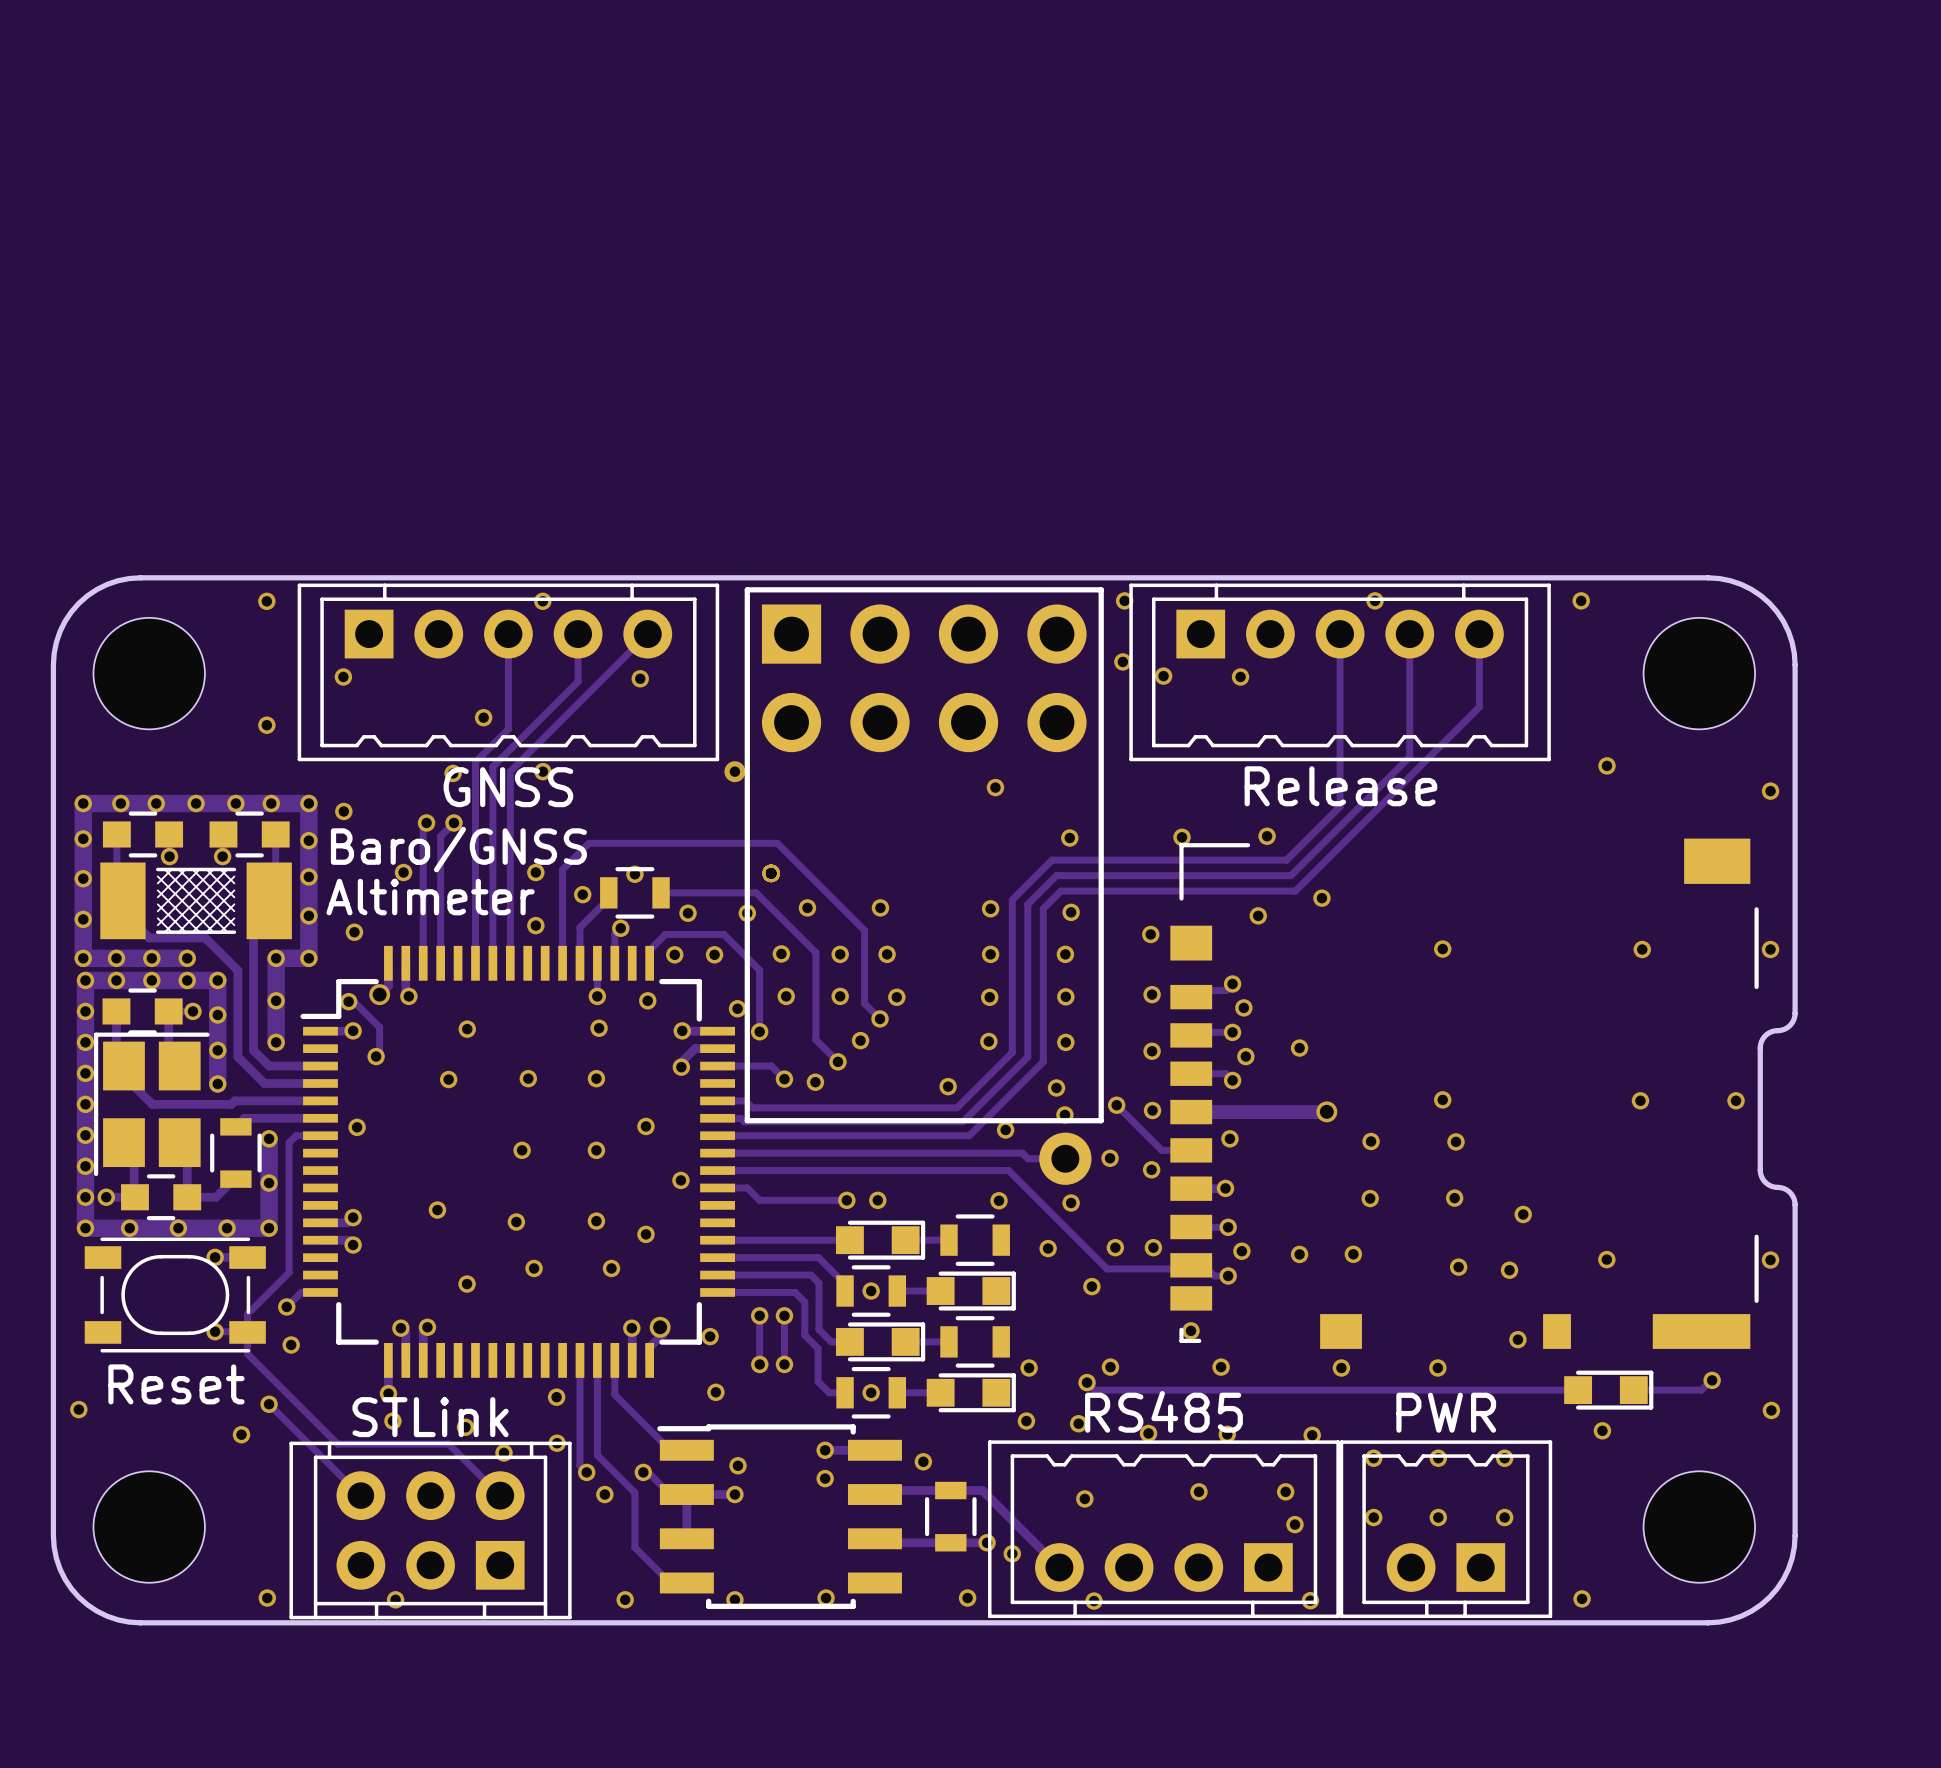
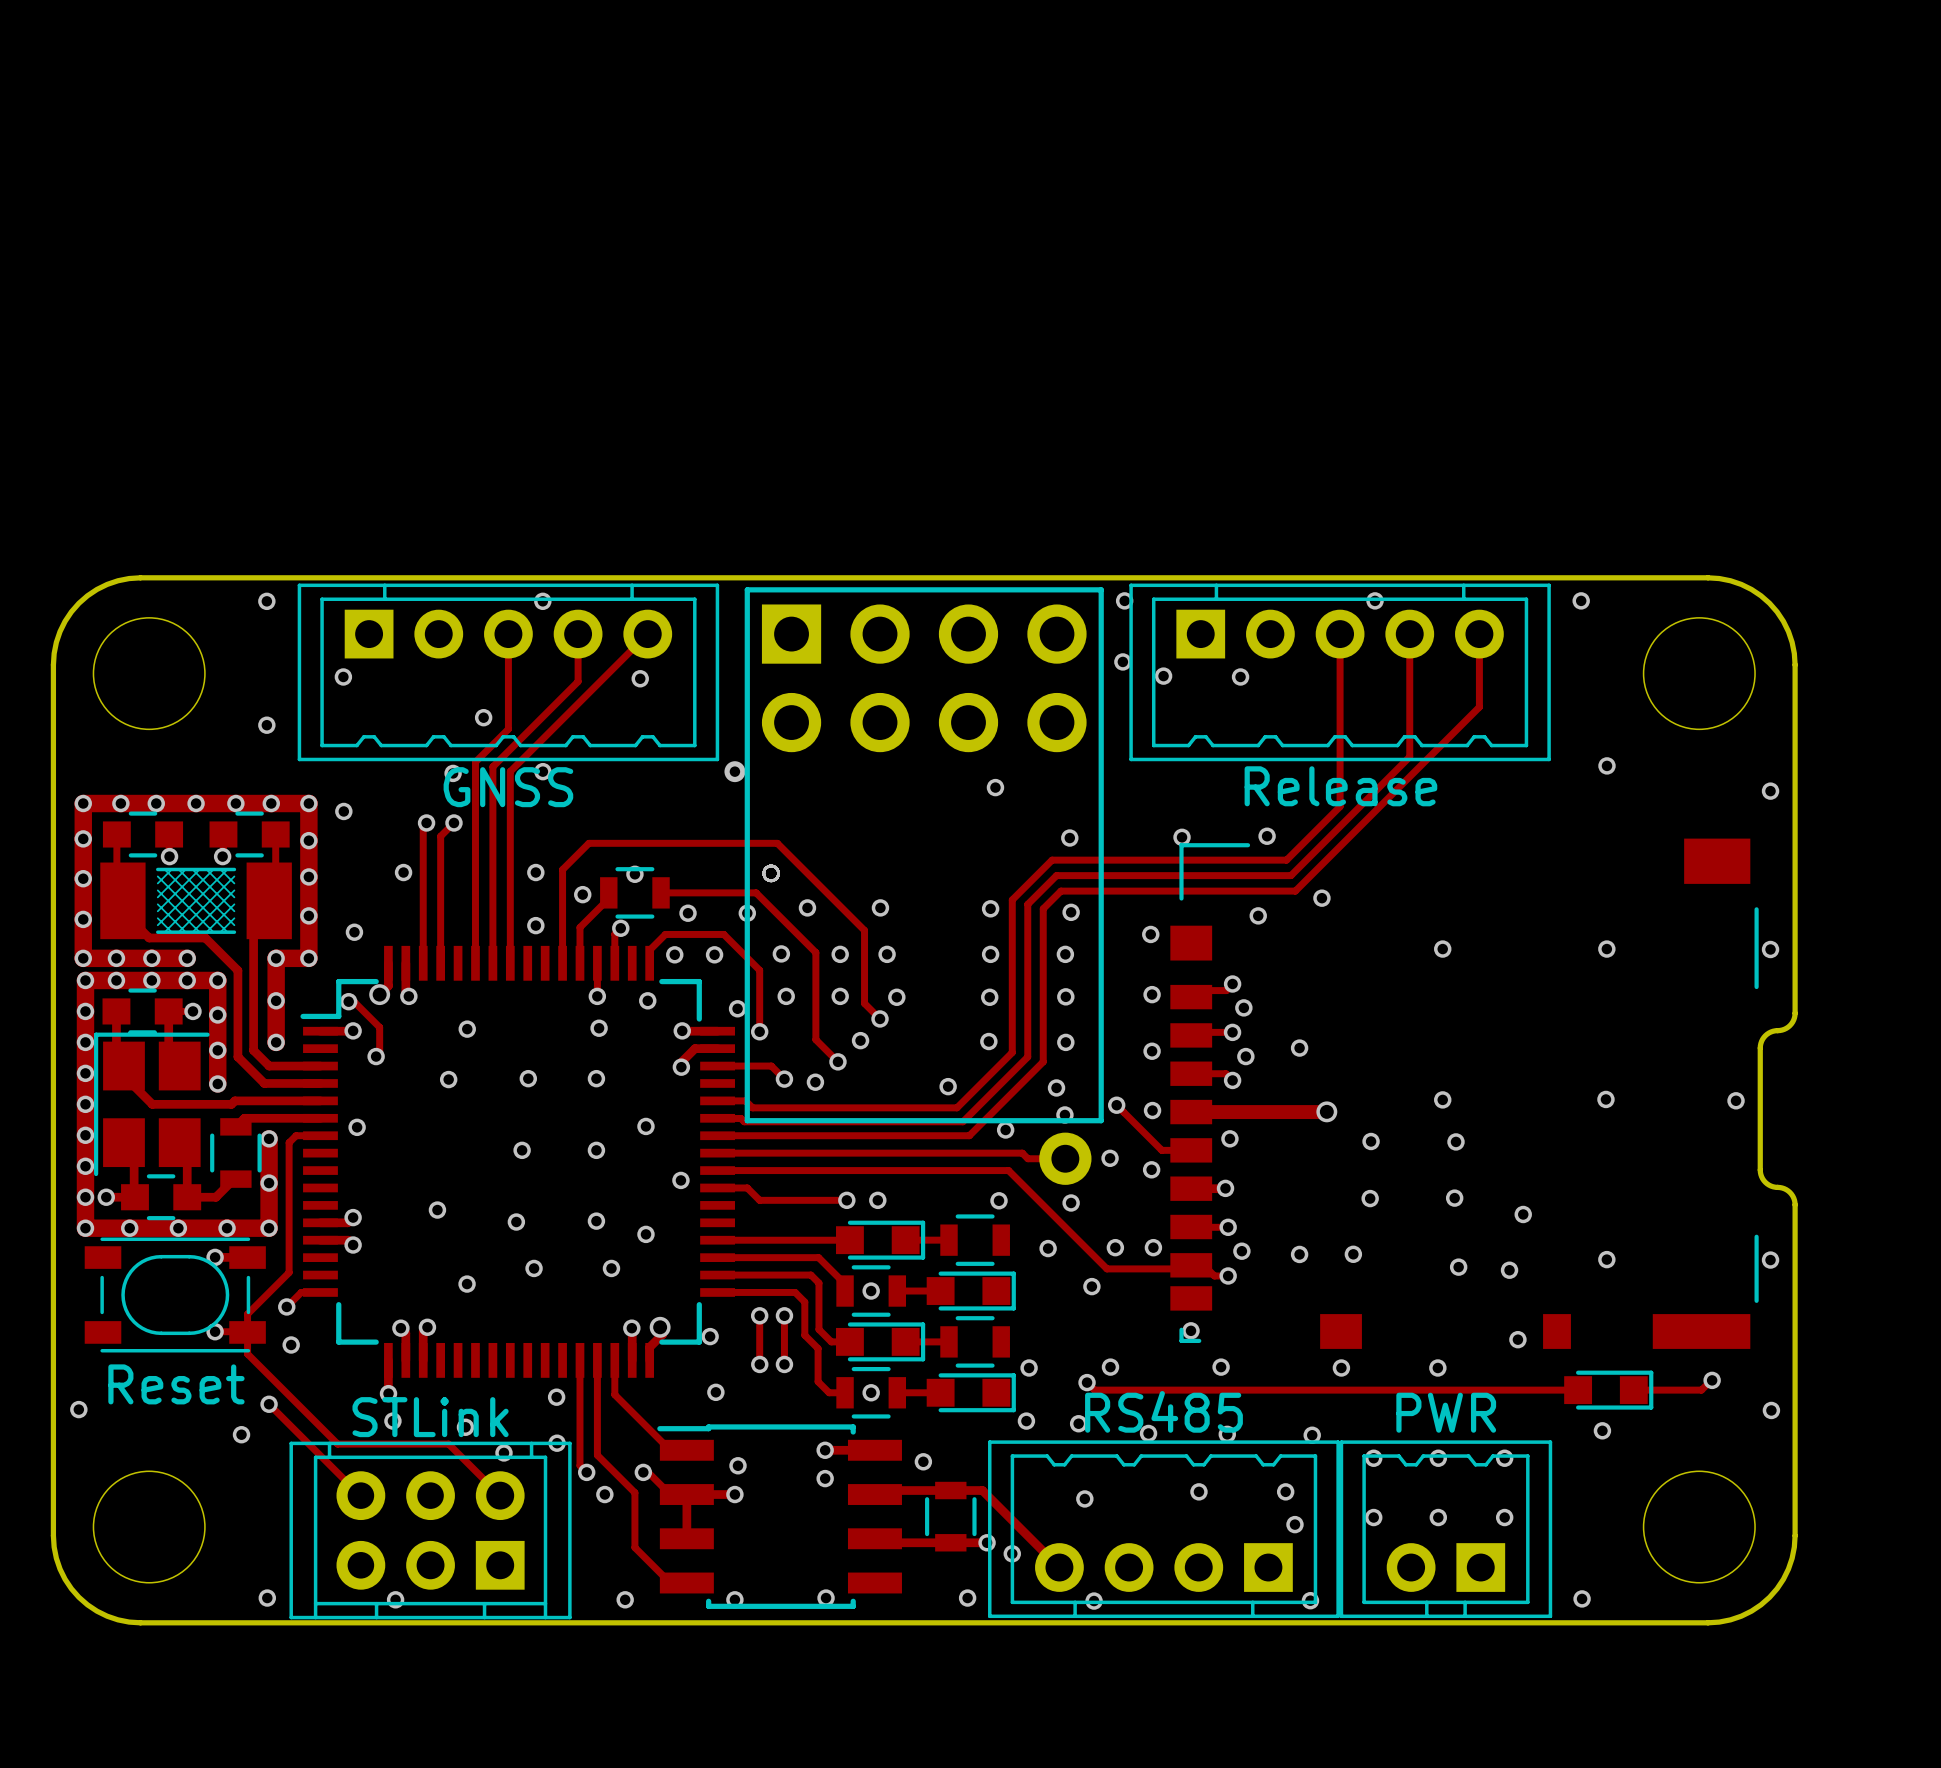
text: Baro/GNSS (458, 849) -> none
text: Altimeter (430, 897) -> none
via position: (1642, 949) -> (1606, 949)
via position: (1640, 1100) -> (1605, 1099)

